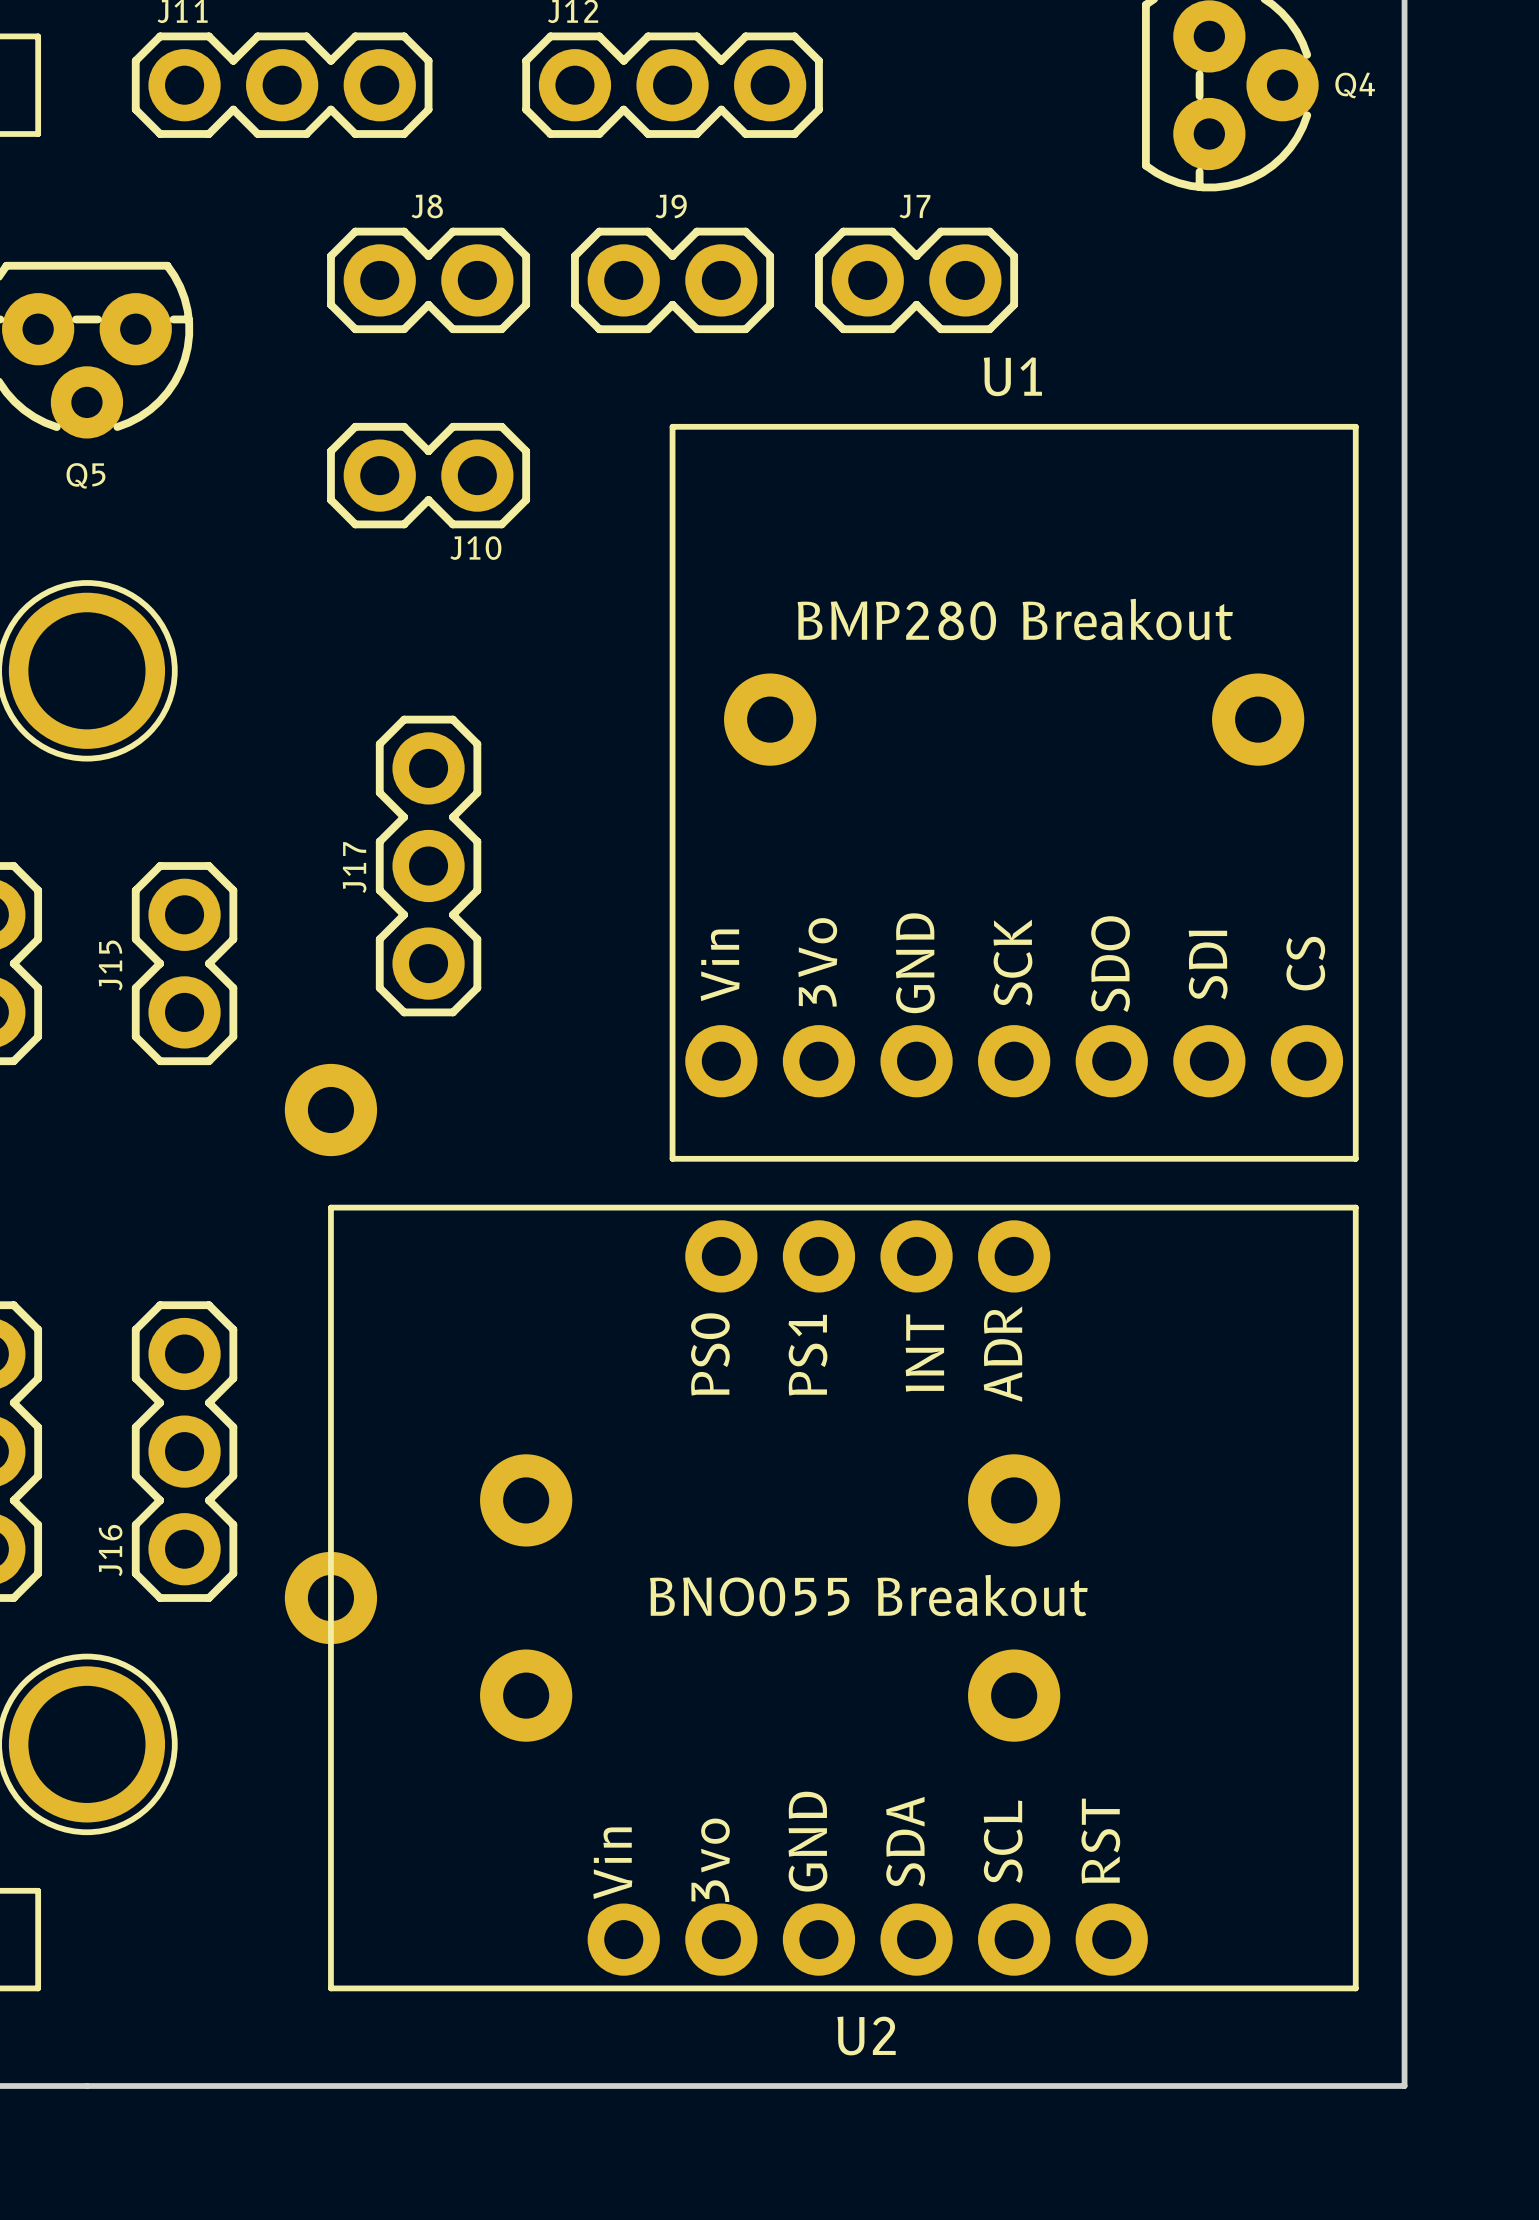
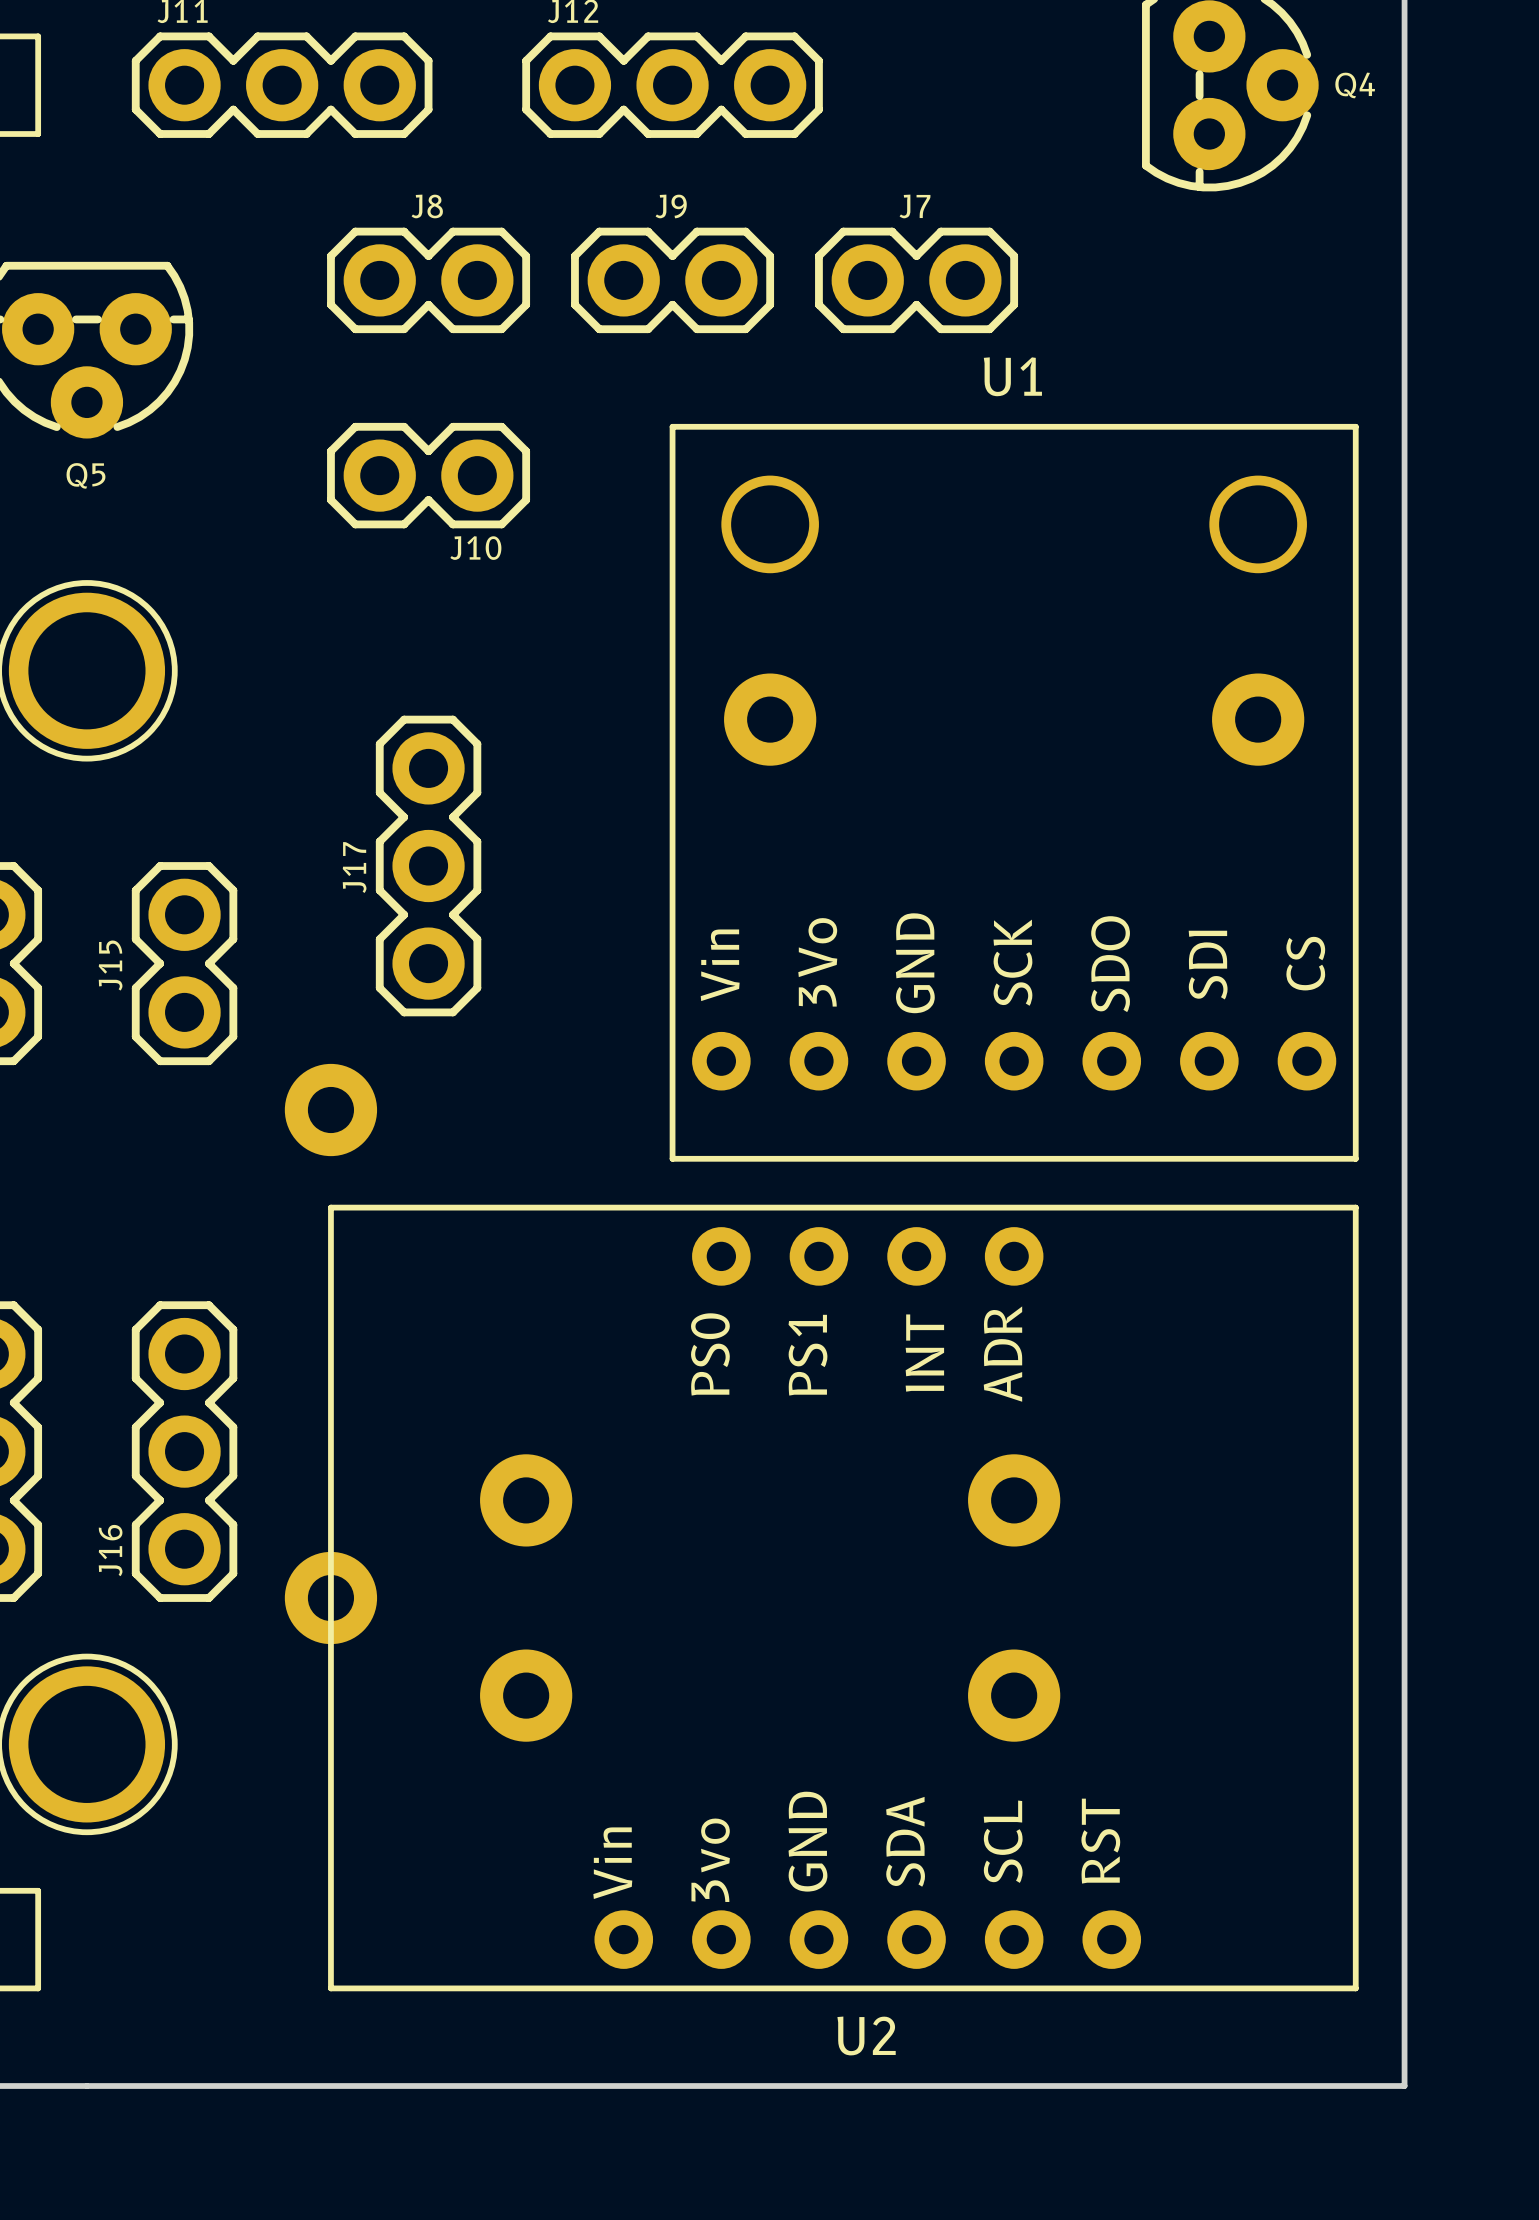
U1 footprint: [669, 423, 1359, 1162] -> [669, 423, 1359, 1162]
U1 value: BMP280 Breakout (1015, 619) -> none
U2 footprint: [328, 1204, 1359, 1992] -> [328, 1204, 1359, 1992]
U2 value: BNO055 Breakout (868, 1595) -> none

